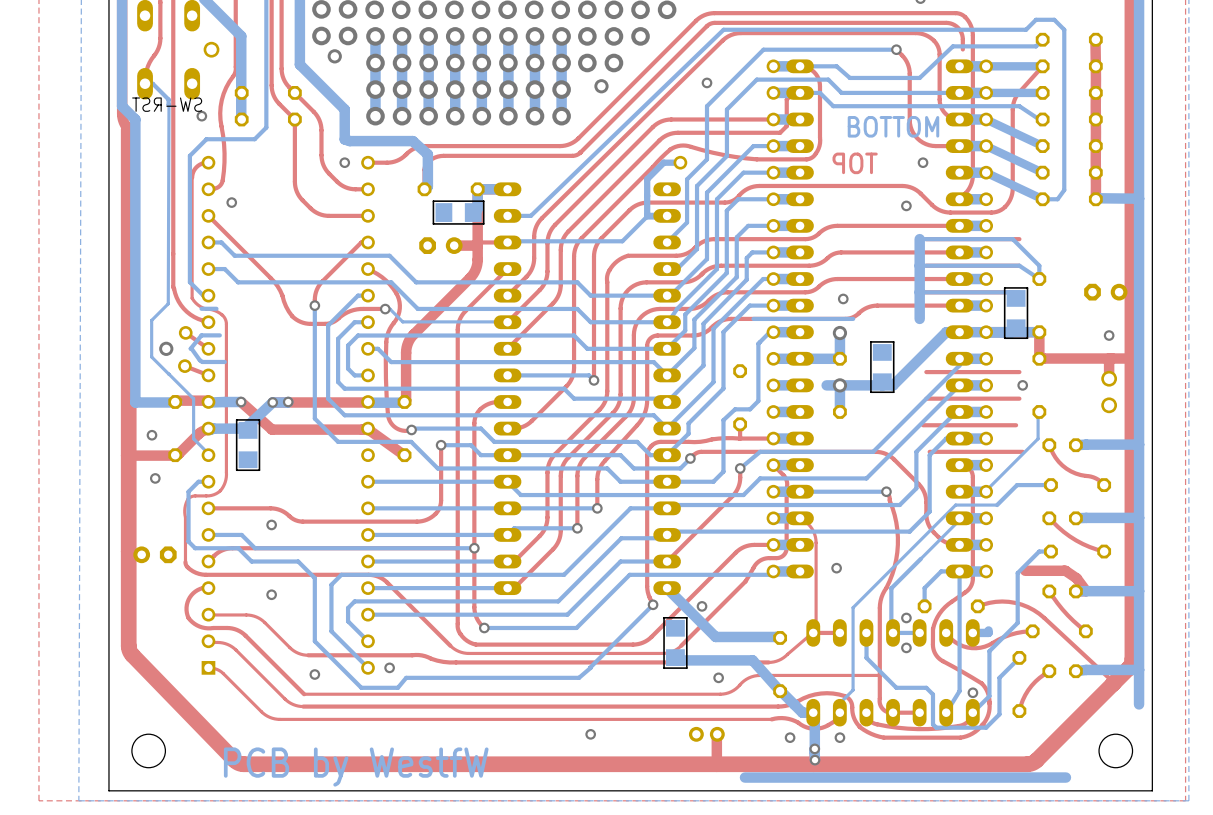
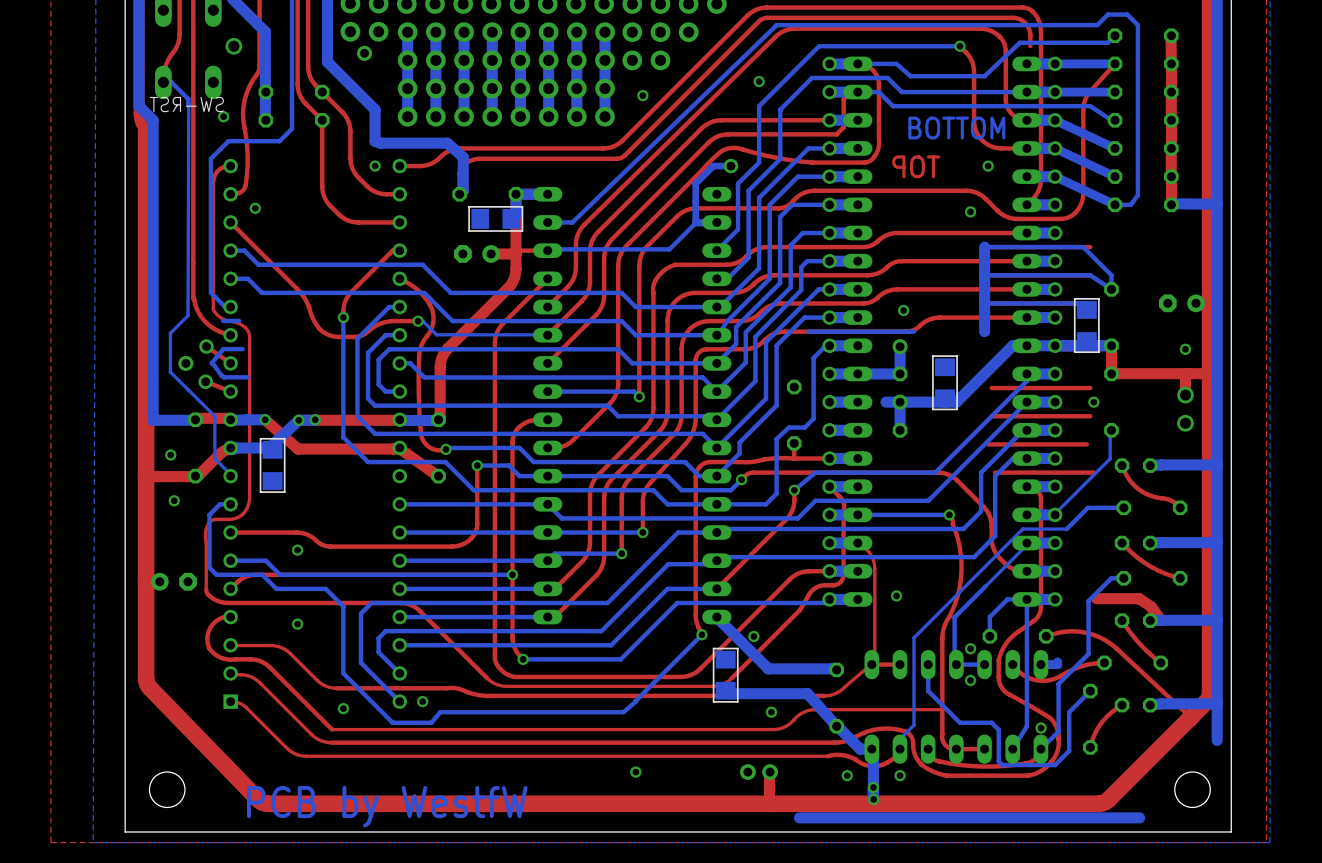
via: (601, 86) -> none
via: none -> (642, 95)

